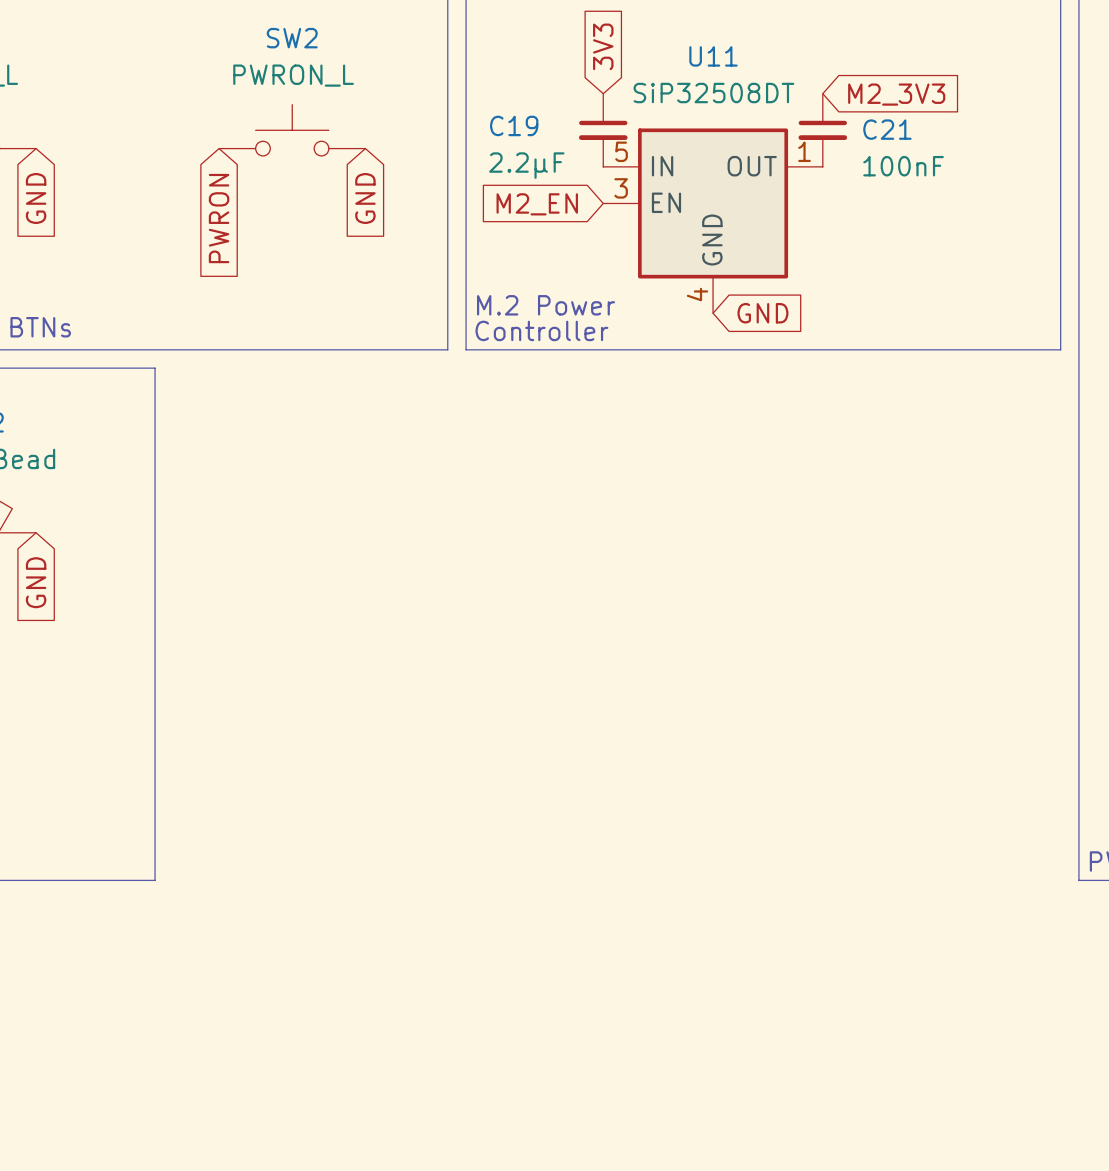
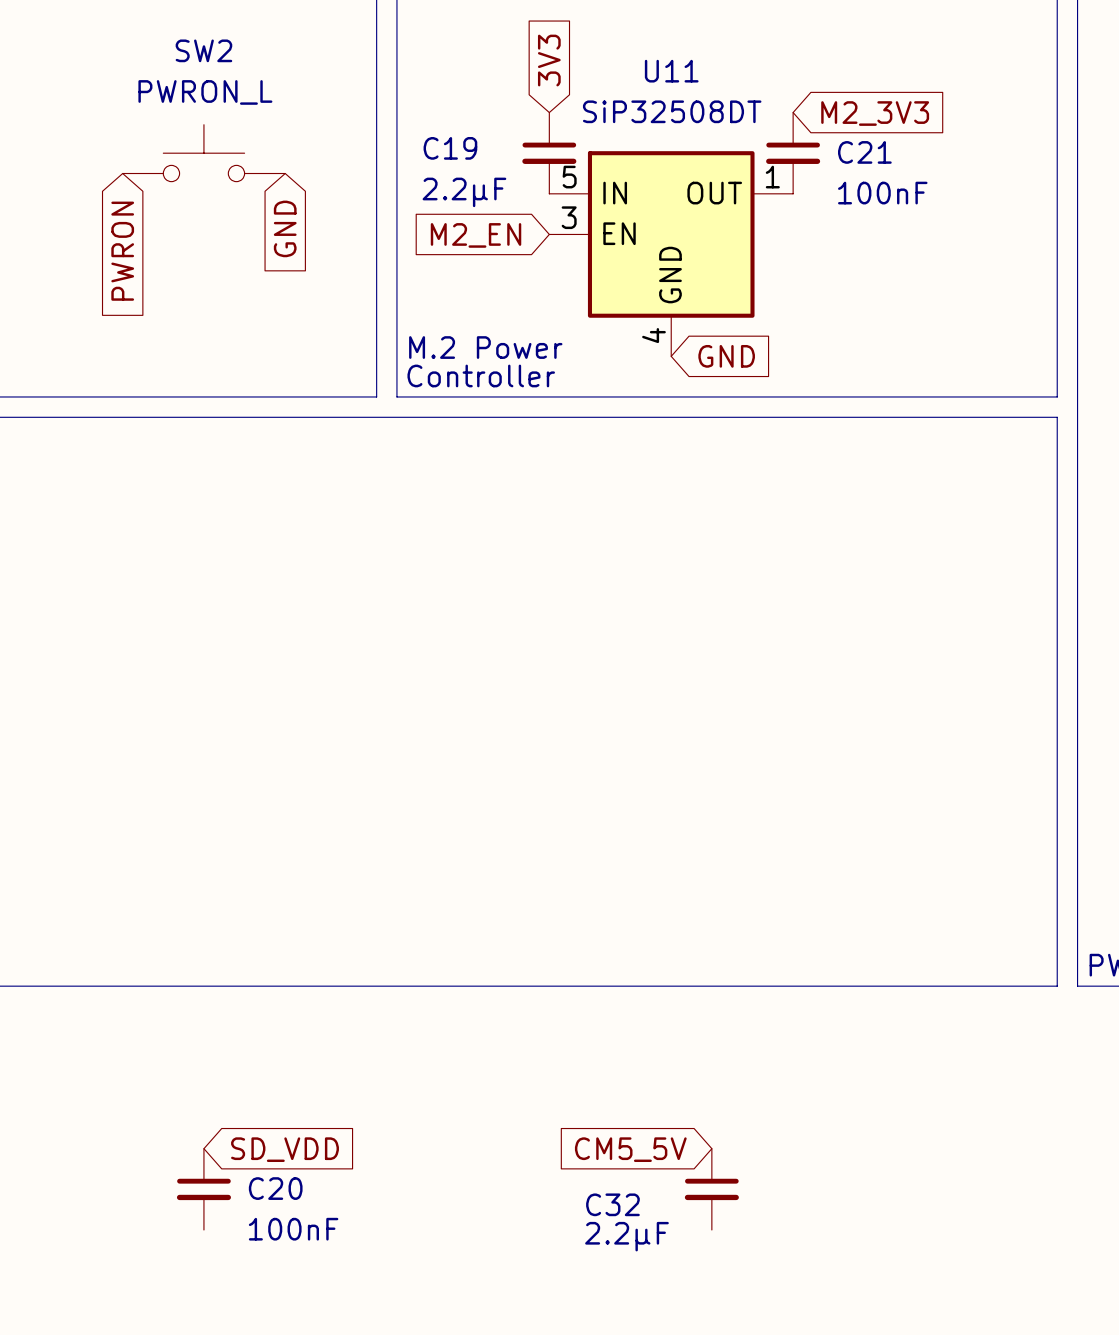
line: (155, 368) (155, 880) -> (51, 417) (1057, 417) (1057, 986) (51, 986)
global label: none -> SD_VDD (285, 1149)
global label: none -> CM5_5V (630, 1149)
C20: none -> 100nF (203, 1189)
C32: none -> 2.2µF (711, 1189)

